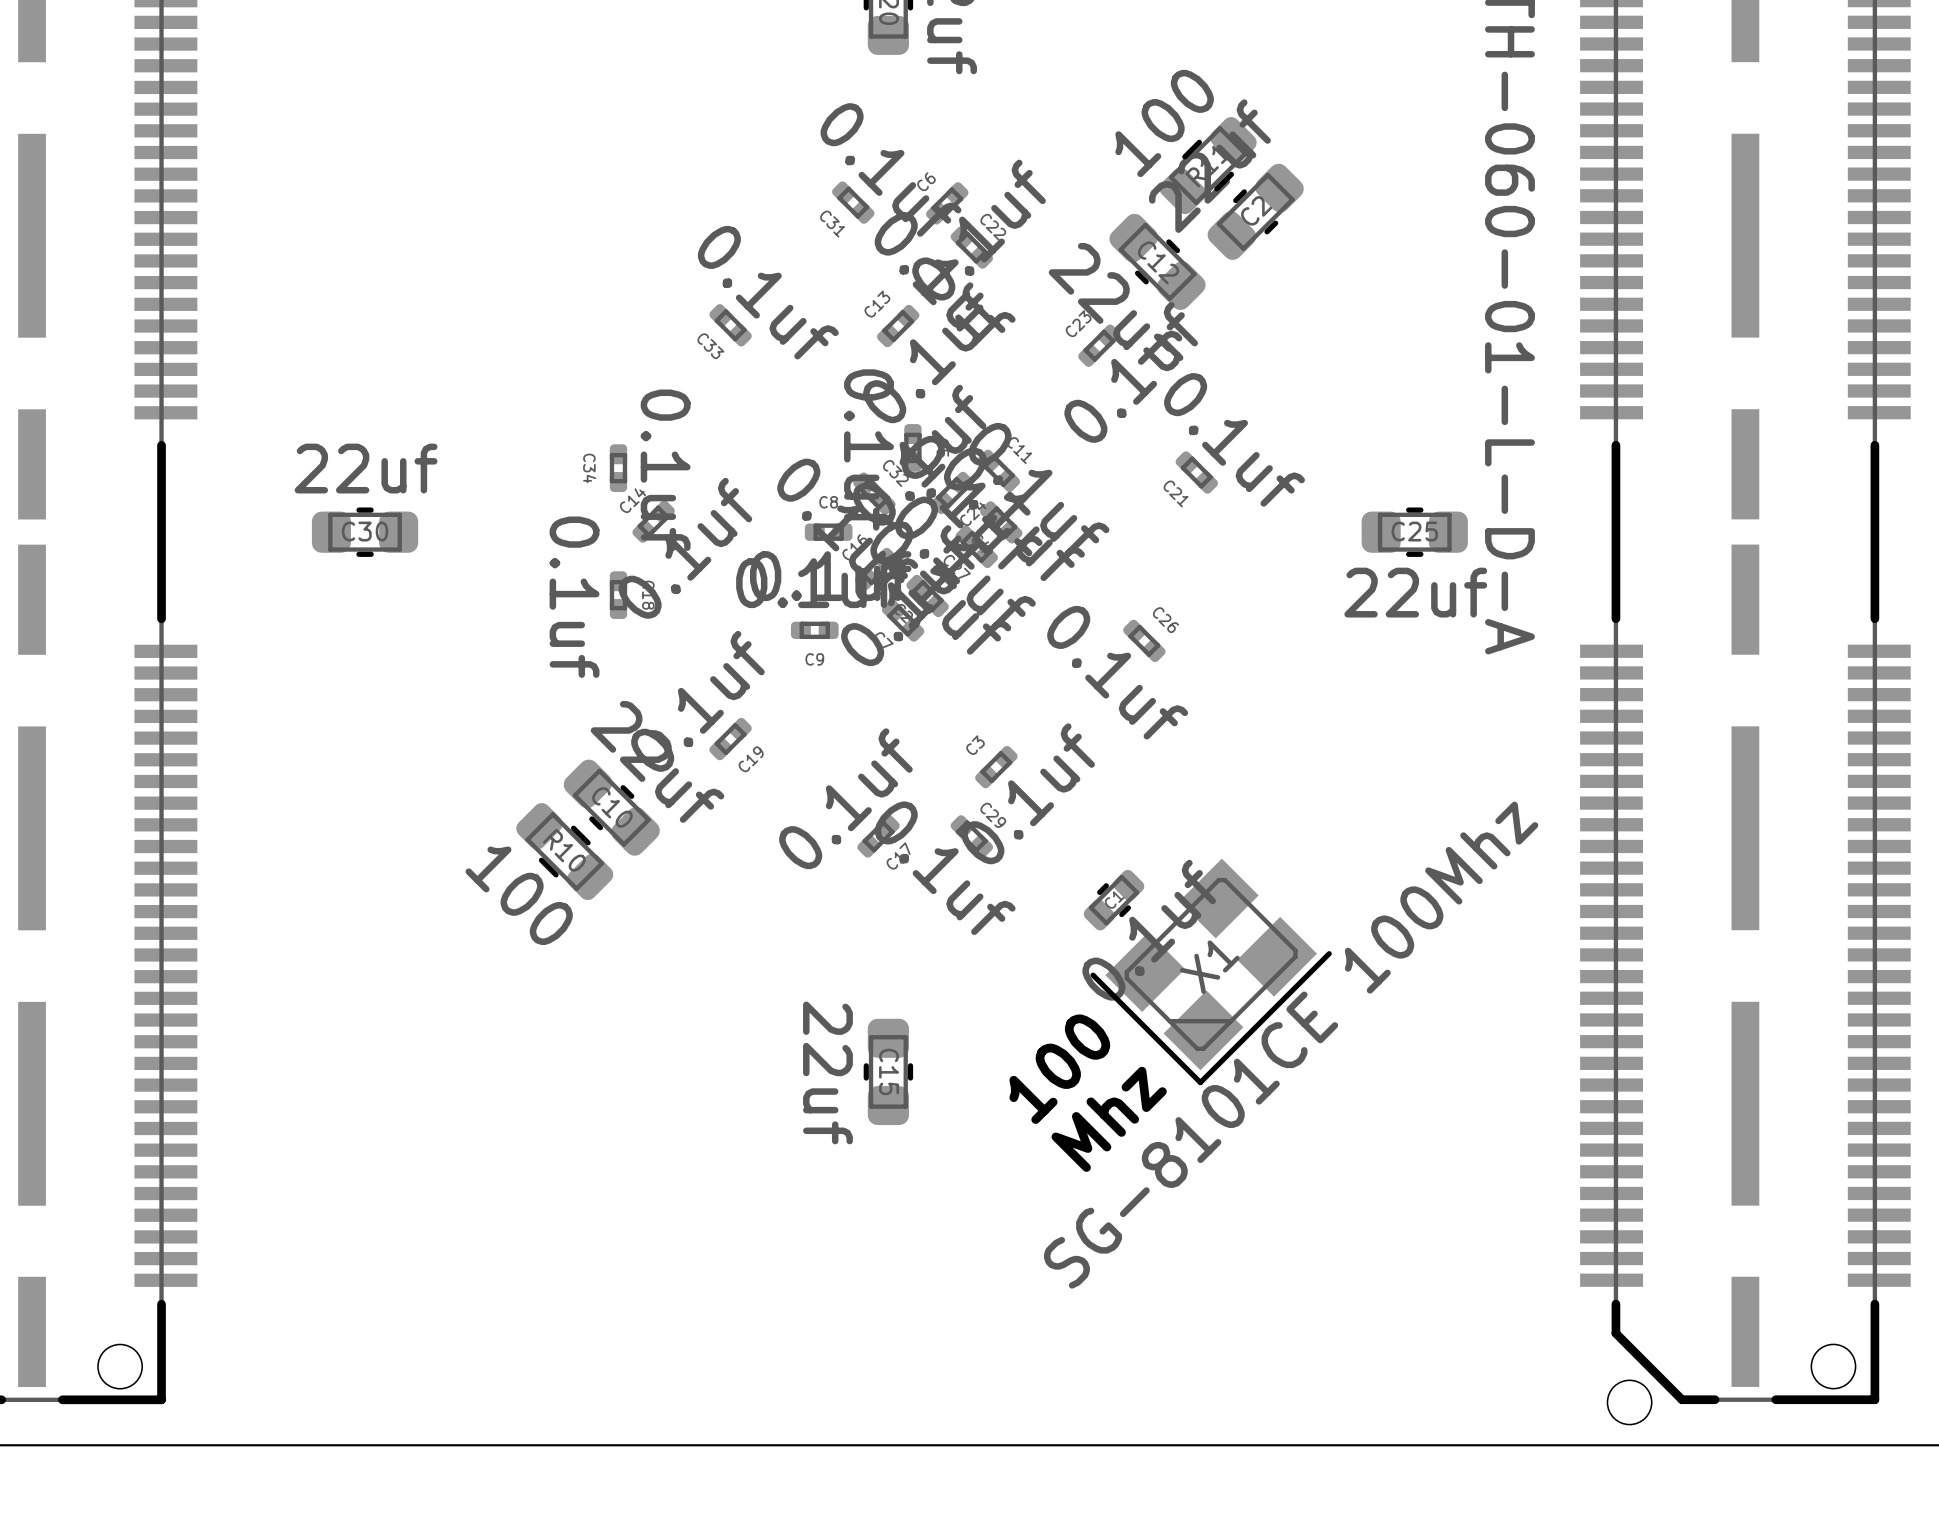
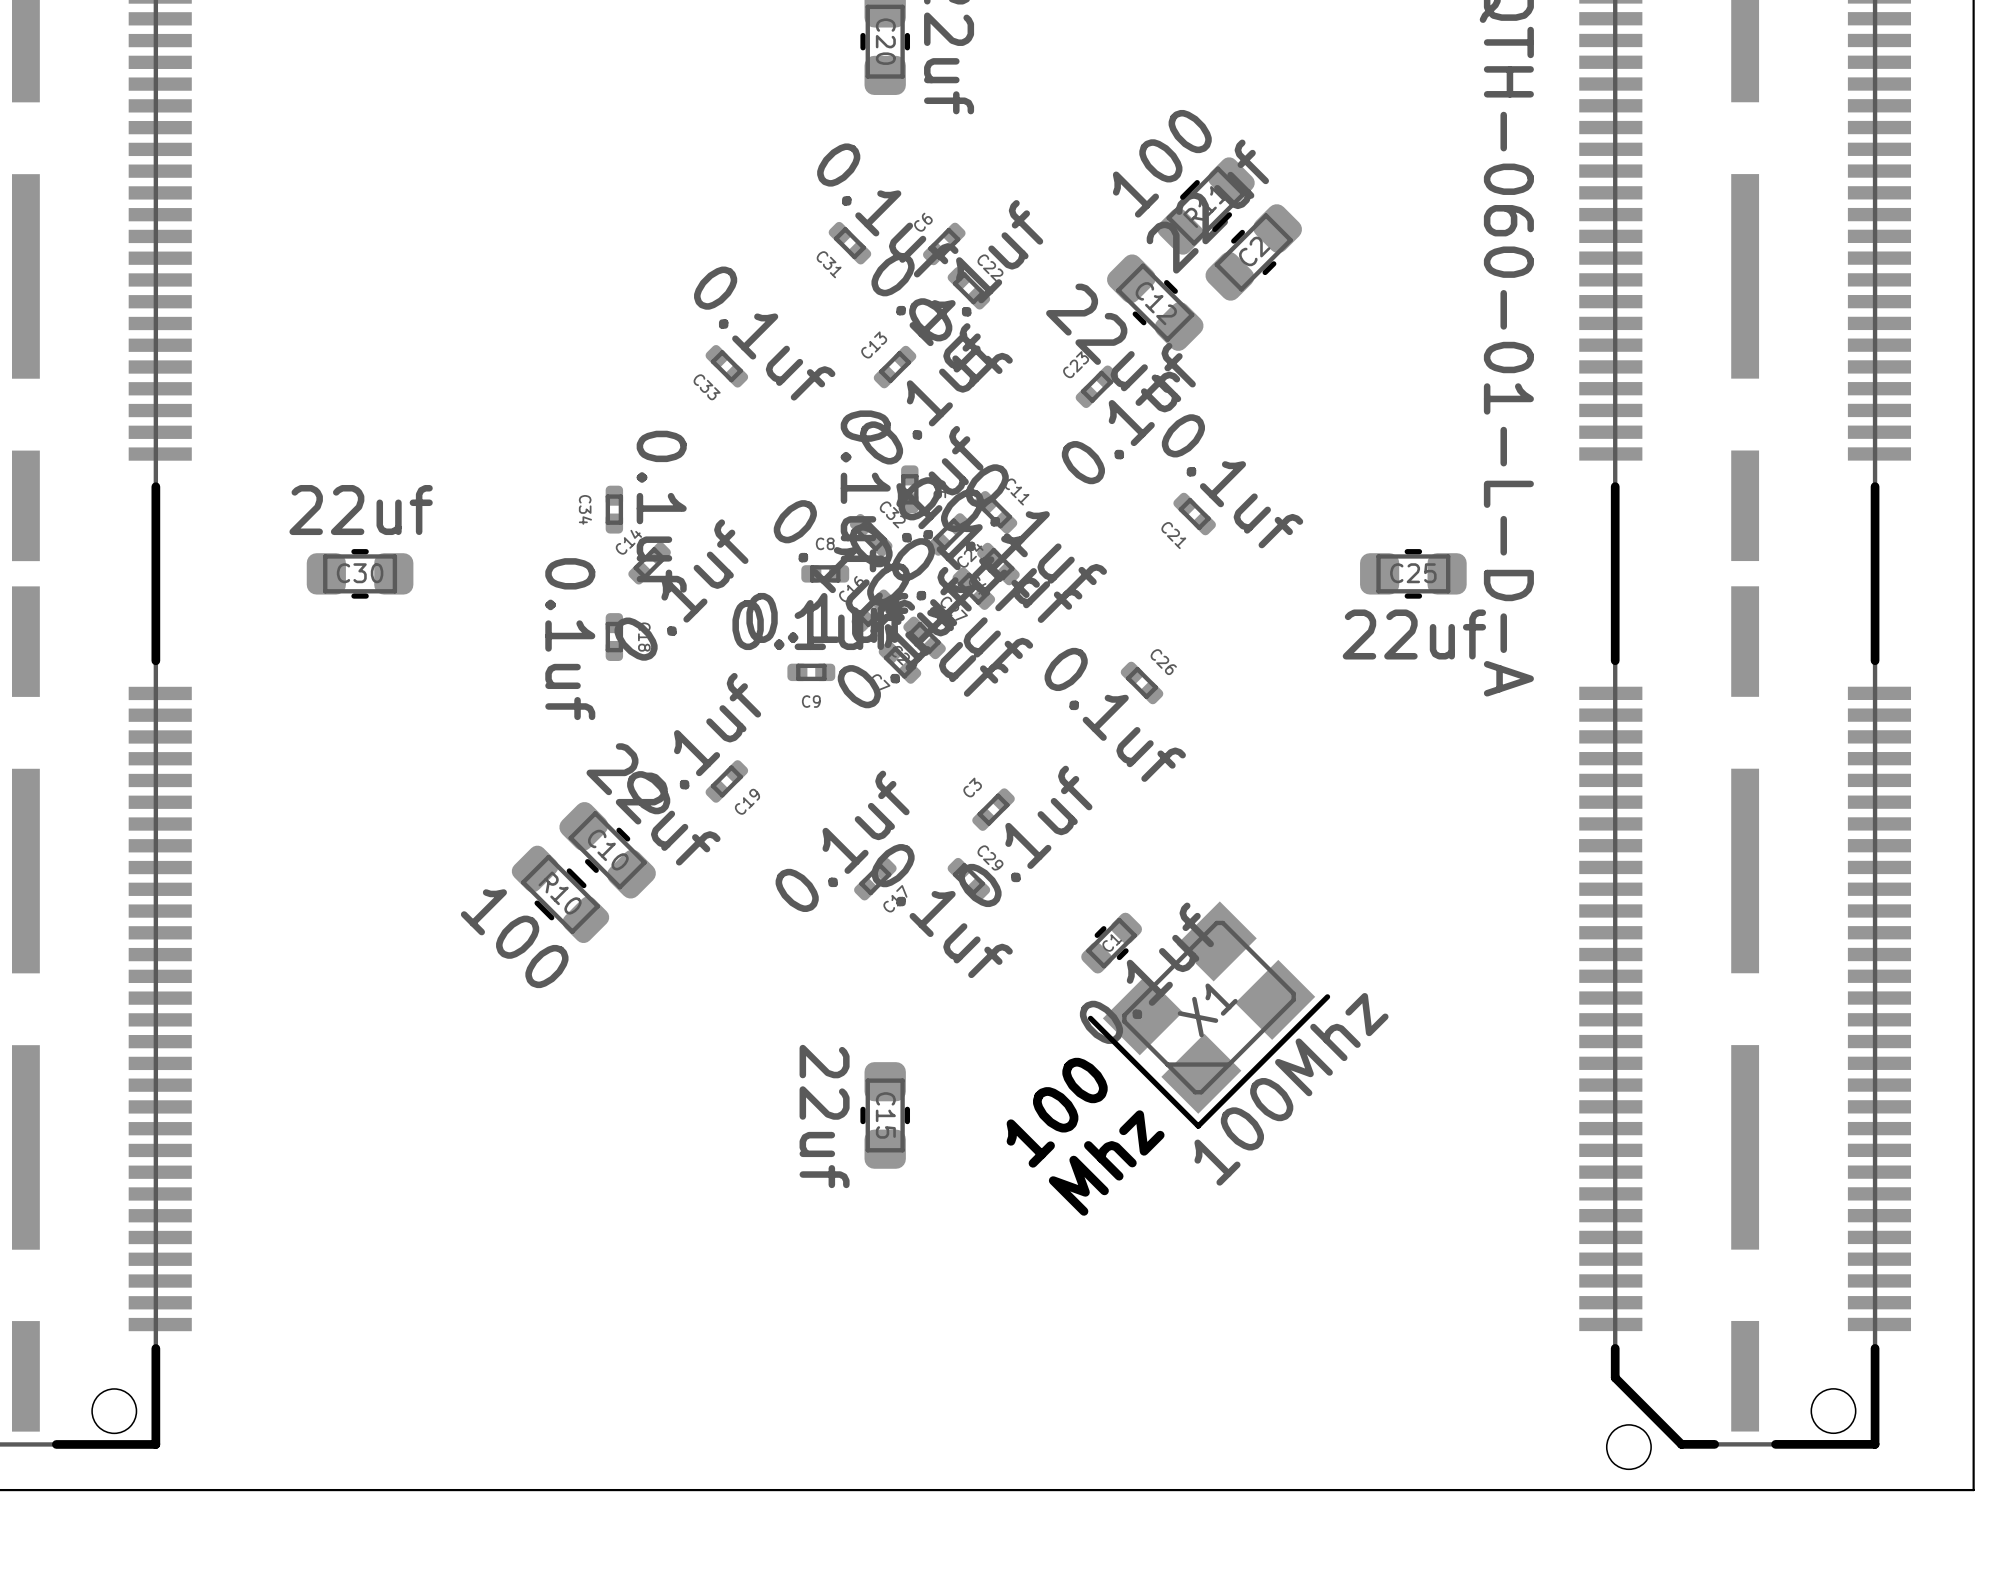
X1 value: SG-8101CE 100Mhz (1291, 1045) -> 100Mhz (1291, 1089)

